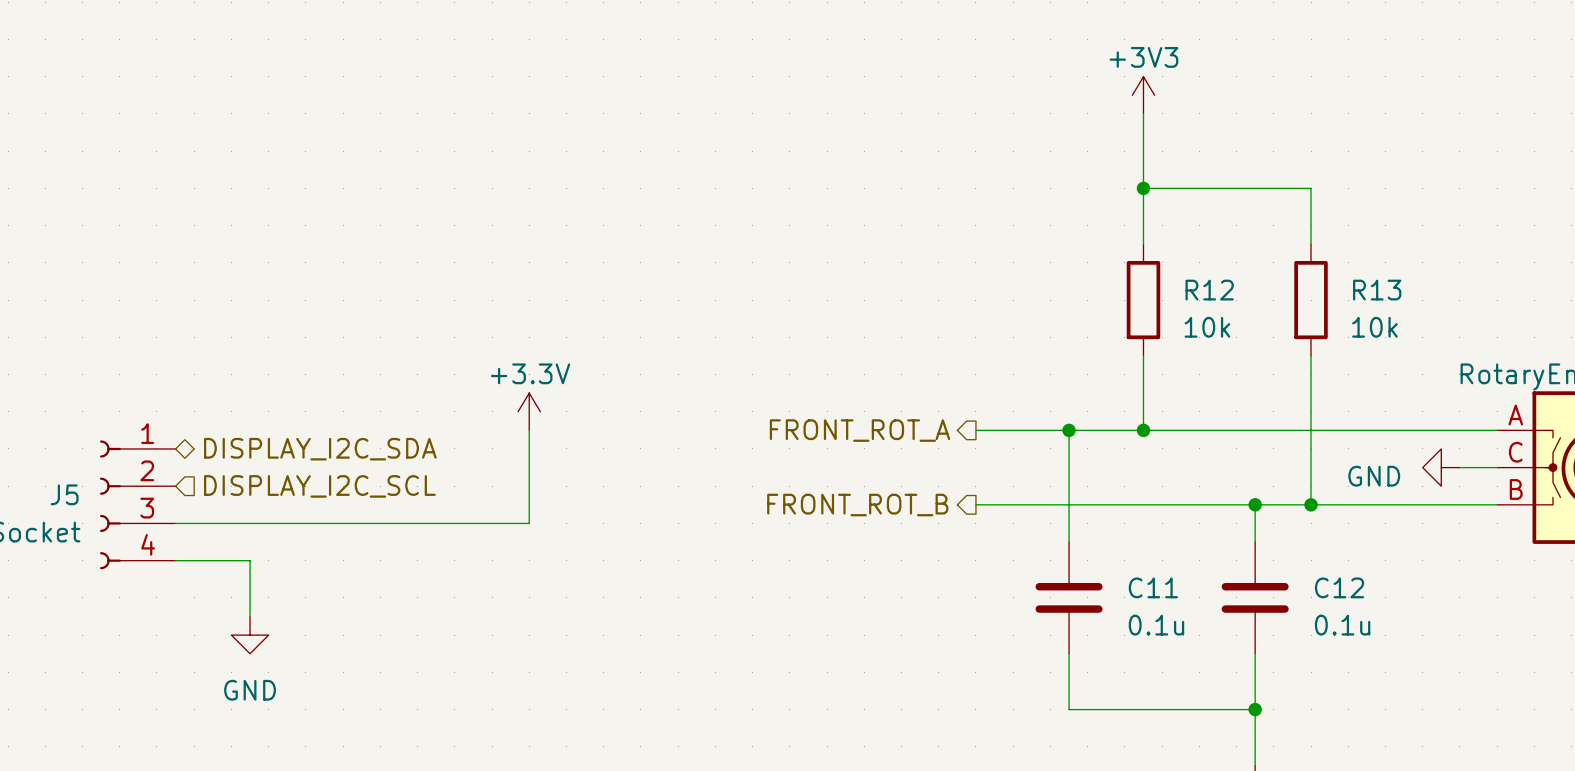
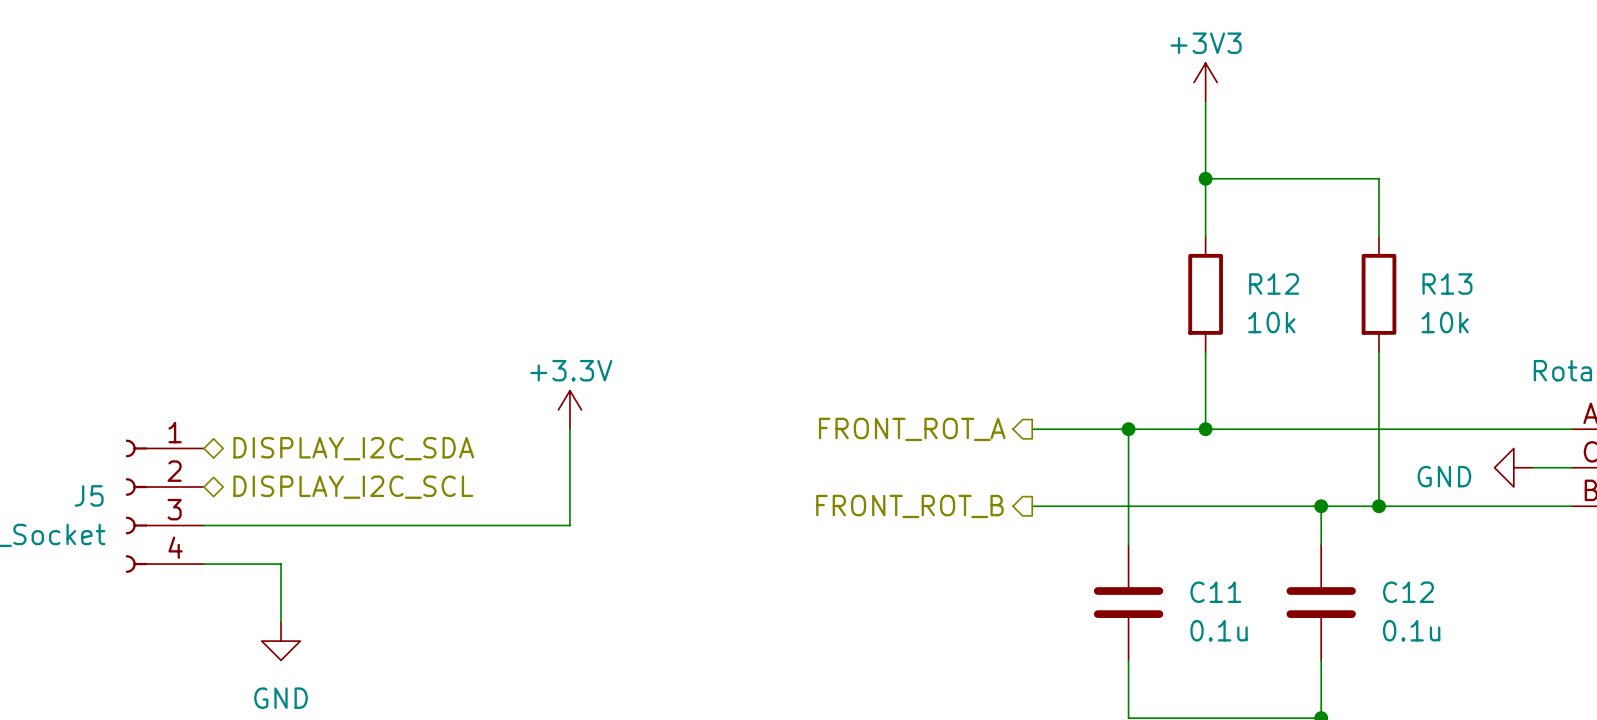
hierarchical label shape: input (319, 486) -> bidirectional (353, 487)

